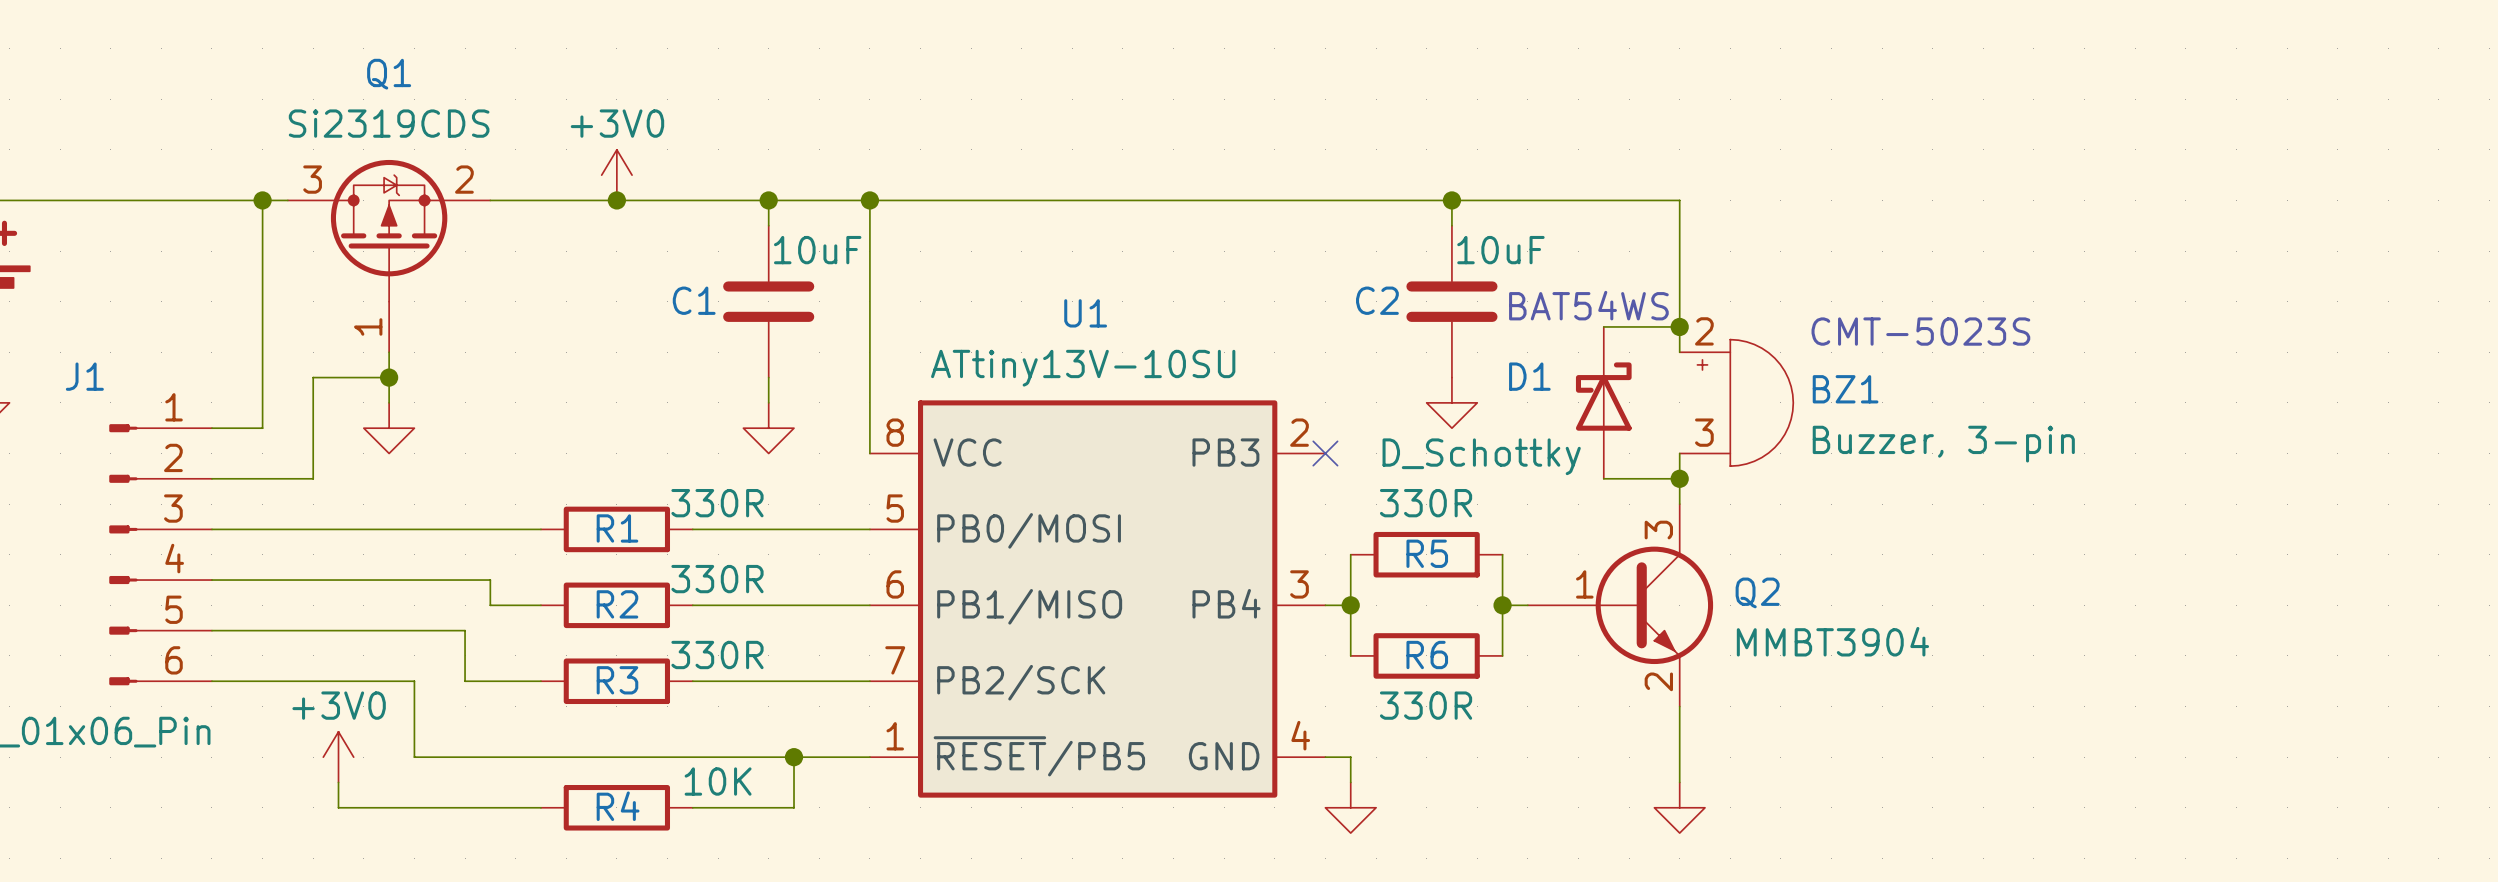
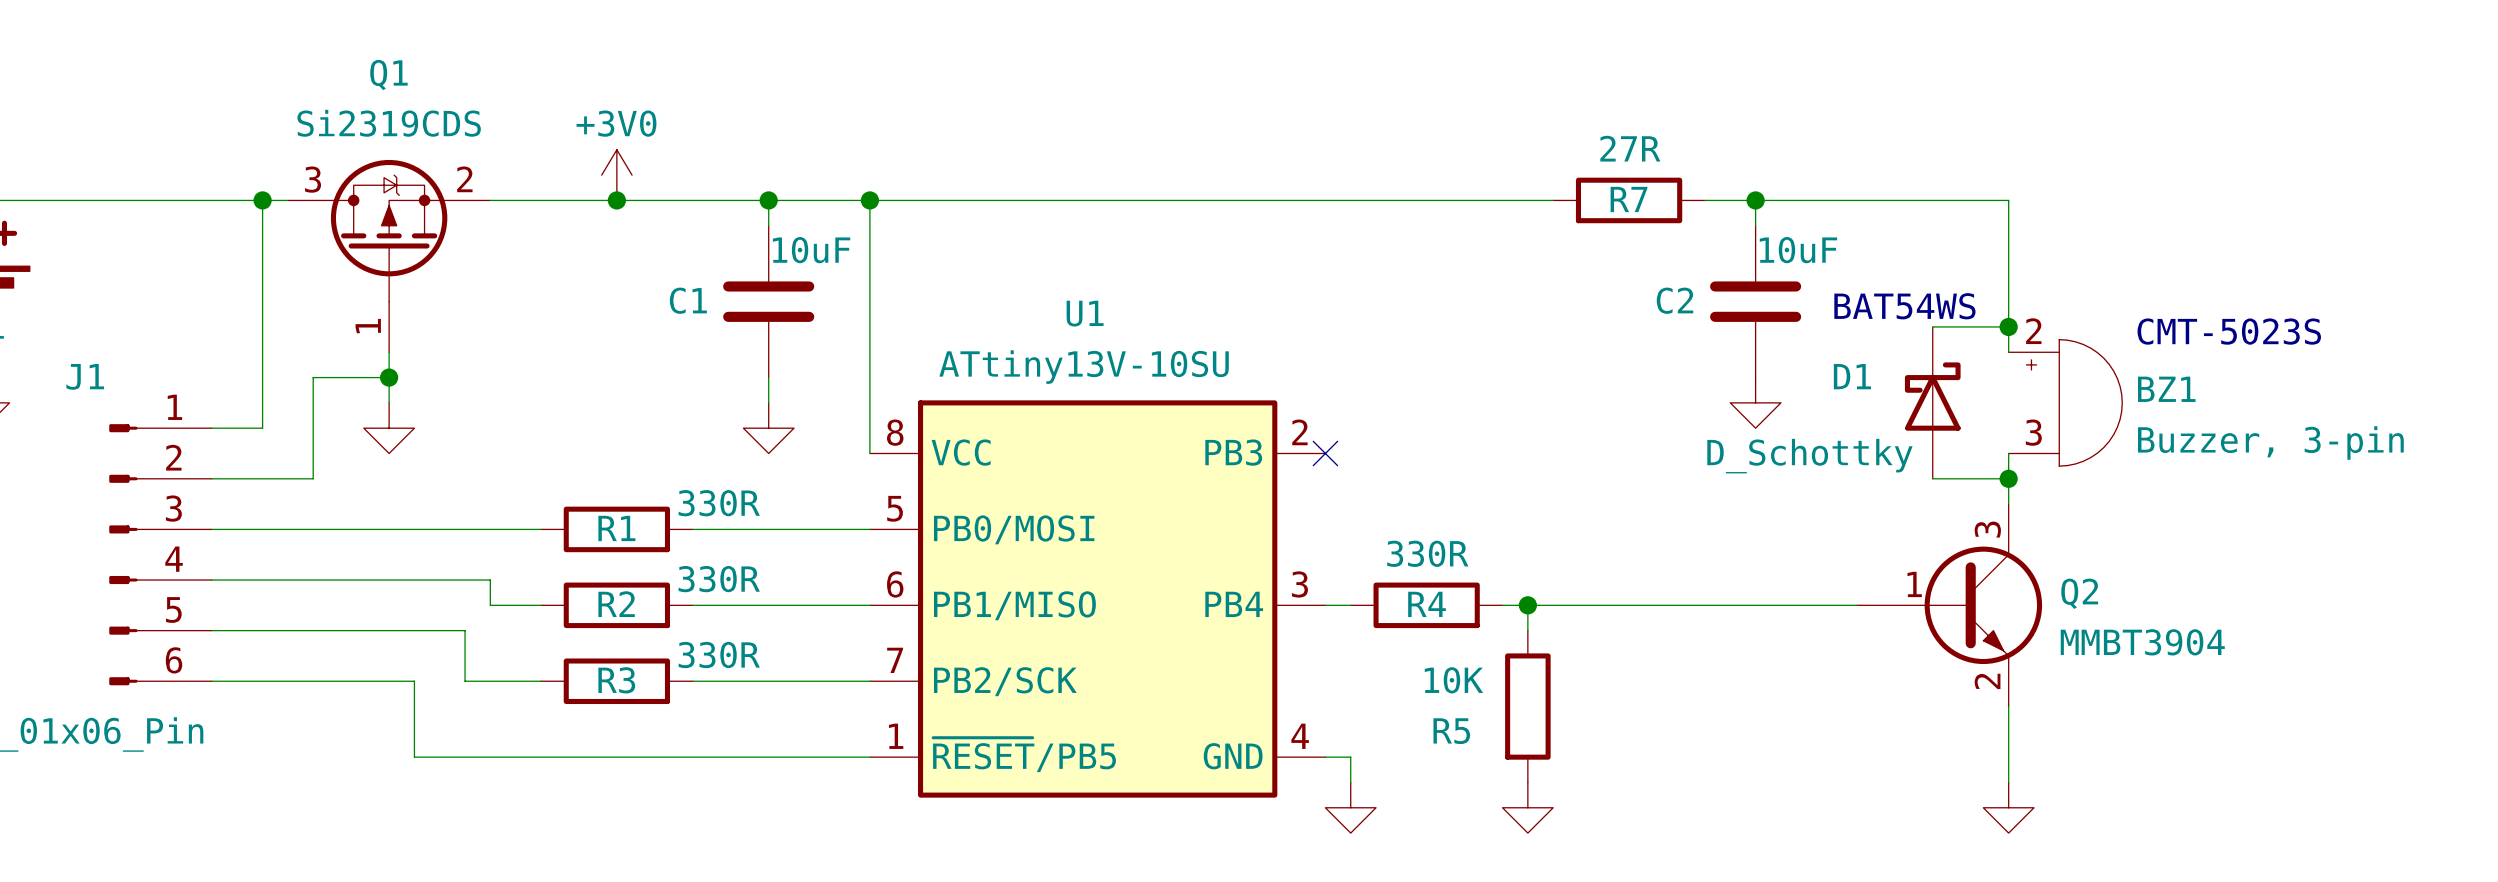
wire: (1451, 200) (1451, 225) -> (1755, 200) (1755, 225)
junction: (1451, 200) -> none
wire: (1553, 200) (1679, 200) (1679, 352) -> none
R7: none -> 27R (1629, 200)
wire: none -> (1705, 200) (2008, 200) (2008, 352)
junction: none -> (1755, 200)
C2 position: (1451, 301) -> (1755, 301)
text position: BAT54WS (1588, 305) -> BAT54WS (1904, 306)
wire: (1603, 326) (1679, 326) -> (1932, 326) (2008, 326)
junction: (1679, 326) -> none
junction: none -> (2008, 326)
text position: CMT-5023S (1920, 331) -> CMT-5023S (2229, 331)
power symbol: (1451, 402) -> none
D1 position: (1603, 402) -> (1932, 402)
BZ1 position: (1736, 402) -> (2065, 402)
power symbol: none -> (1755, 402)
wire: (1679, 453) (1679, 504) -> (2008, 453) (2008, 504)
wire: (1603, 478) (1679, 478) -> (1932, 478) (2008, 478)
junction: (1679, 478) -> none
junction: none -> (2008, 478)
R5 value: 330R (1426, 503) -> 10K (1453, 680)
R5 name position: R5 (1427, 553) -> R5 (1451, 731)
wire: (1350, 554) (1350, 655) -> none
R5 rotation: 0° (1426, 554) -> 90° clockwise (1527, 706)
R5 position: (1426, 554) -> (1527, 706)
wire: (1502, 554) (1502, 655) -> none
junction: (1350, 605) -> none
junction position: (1502, 605) -> (1527, 605)
Q2 position: (1620, 605) -> (1949, 605)
wire: none -> (1856, 605) (1527, 605) (1527, 630)
R6: 330R (1426, 655) -> none
wire: (1679, 706) (1679, 782) -> (2008, 706) (2008, 782)
power symbol: +3V0 (338, 757) -> none
wire: (794, 757) (794, 807) (692, 807) -> none
junction: (794, 757) -> none
R4 value: 10K (718, 781) -> 330R (1427, 553)
wire: (338, 782) (338, 807) (540, 807) -> none
R4 position: (616, 807) -> (1426, 605)
power symbol position: (1679, 807) -> (1527, 807)
power symbol: none -> (2008, 807)

